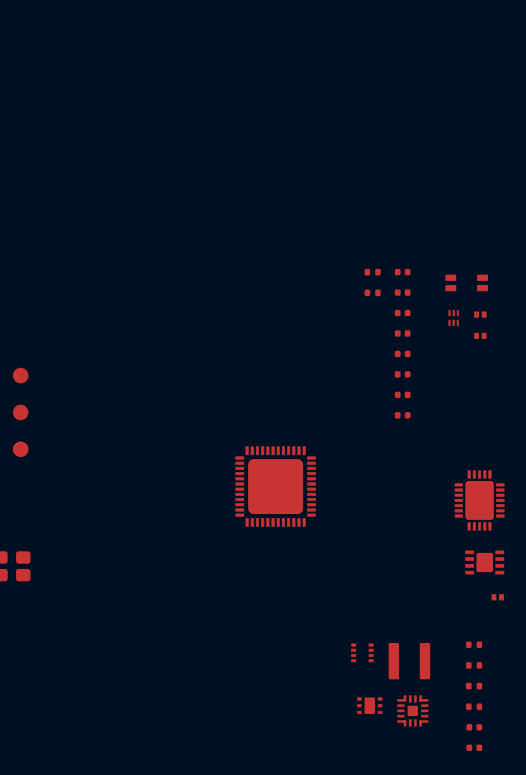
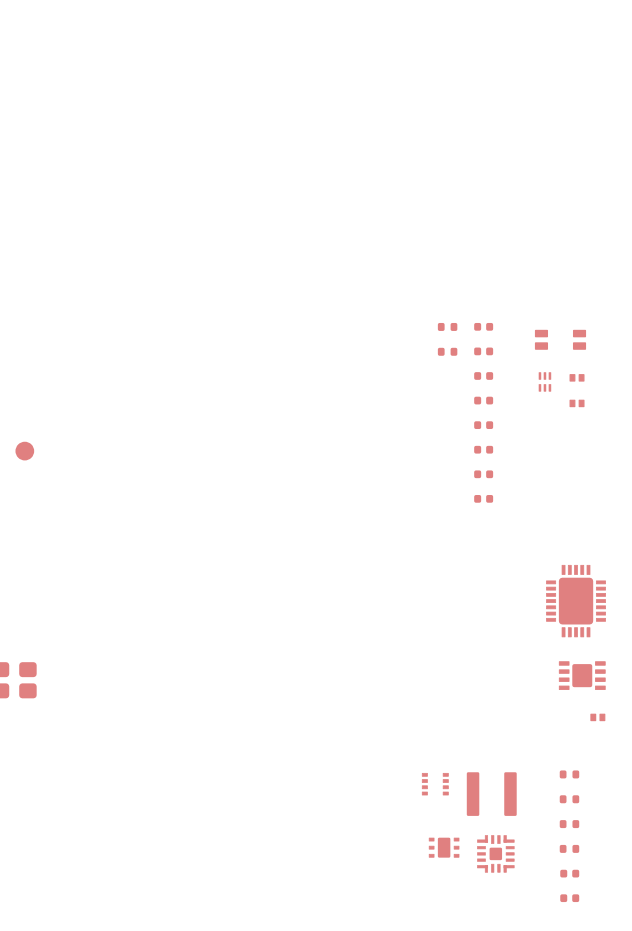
part: (20, 412) -> none
part: (20, 449) -> none
part: (275, 486) -> none

